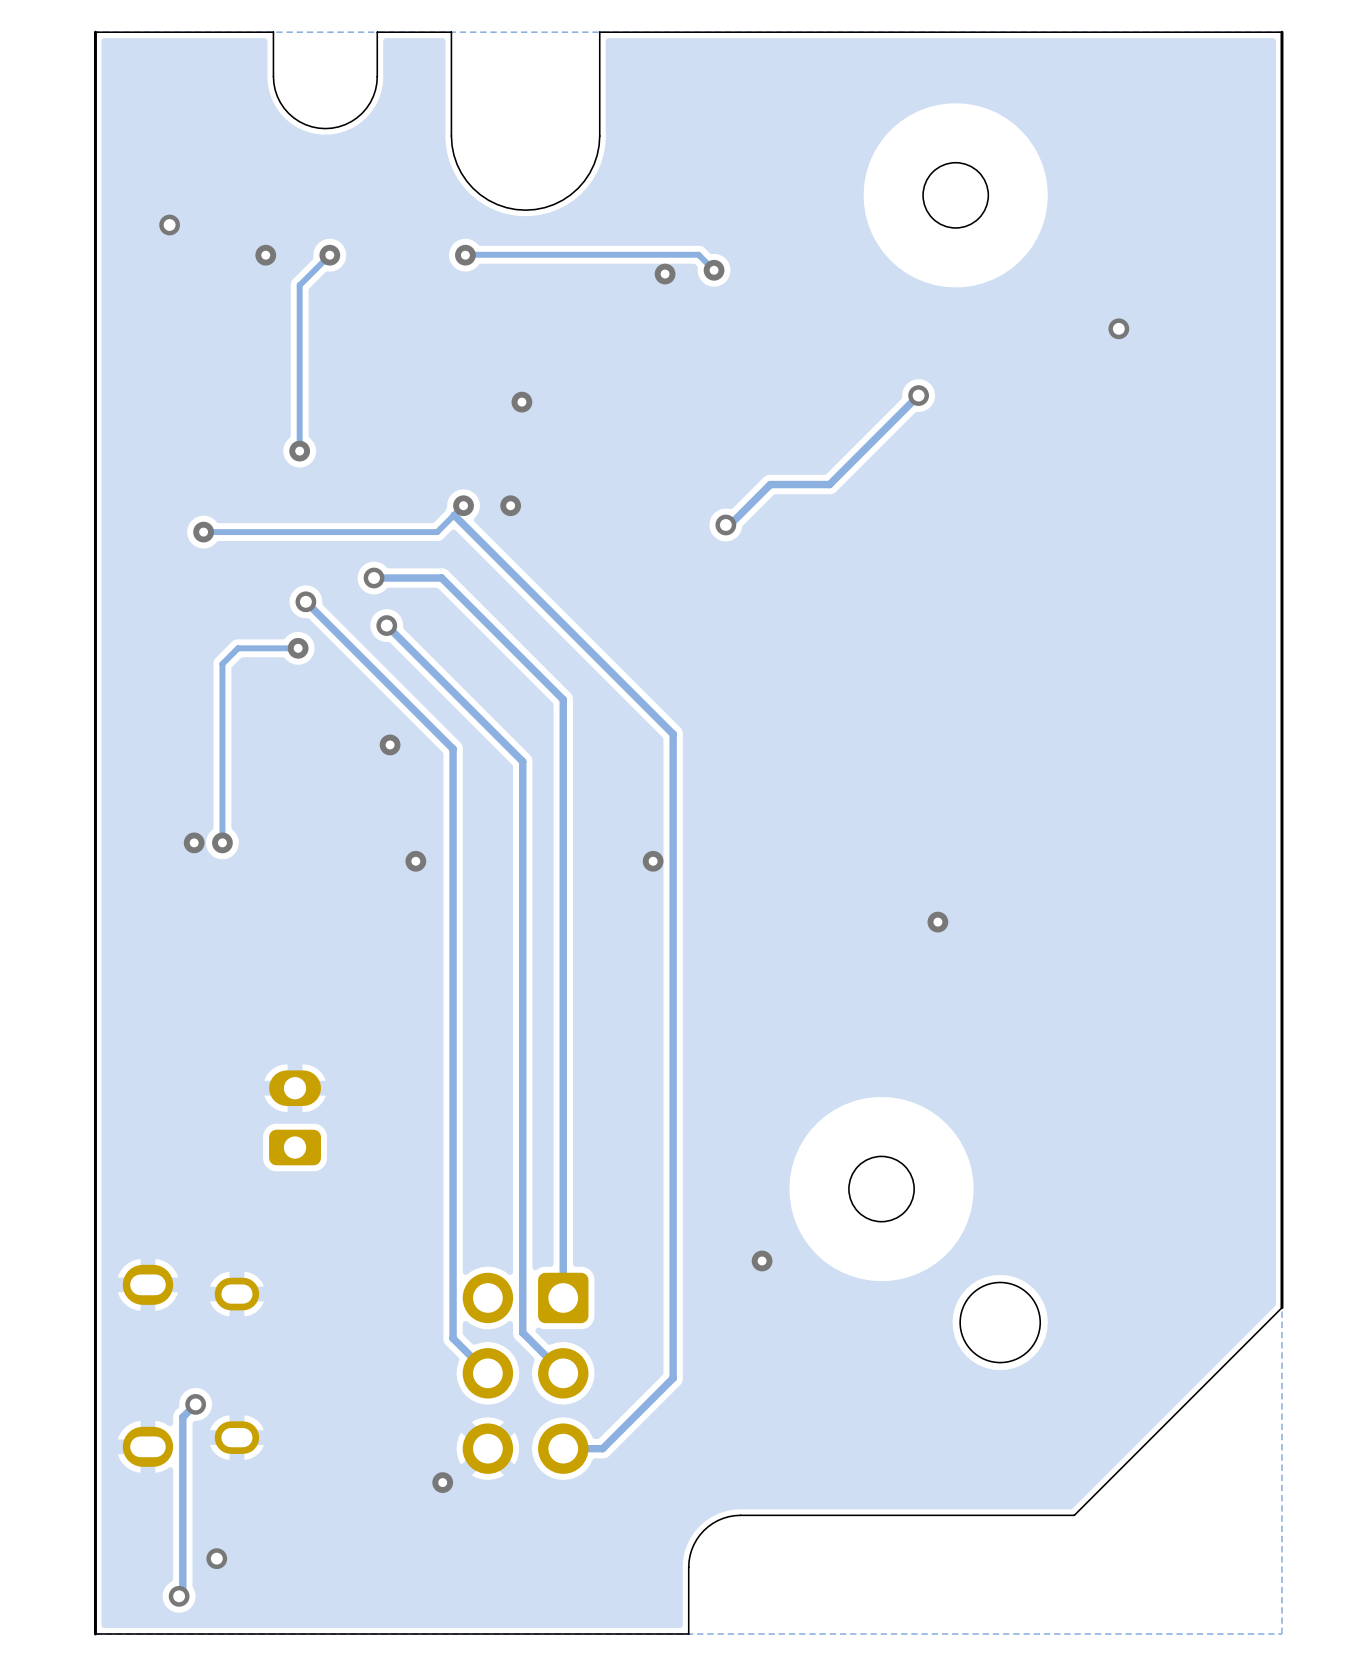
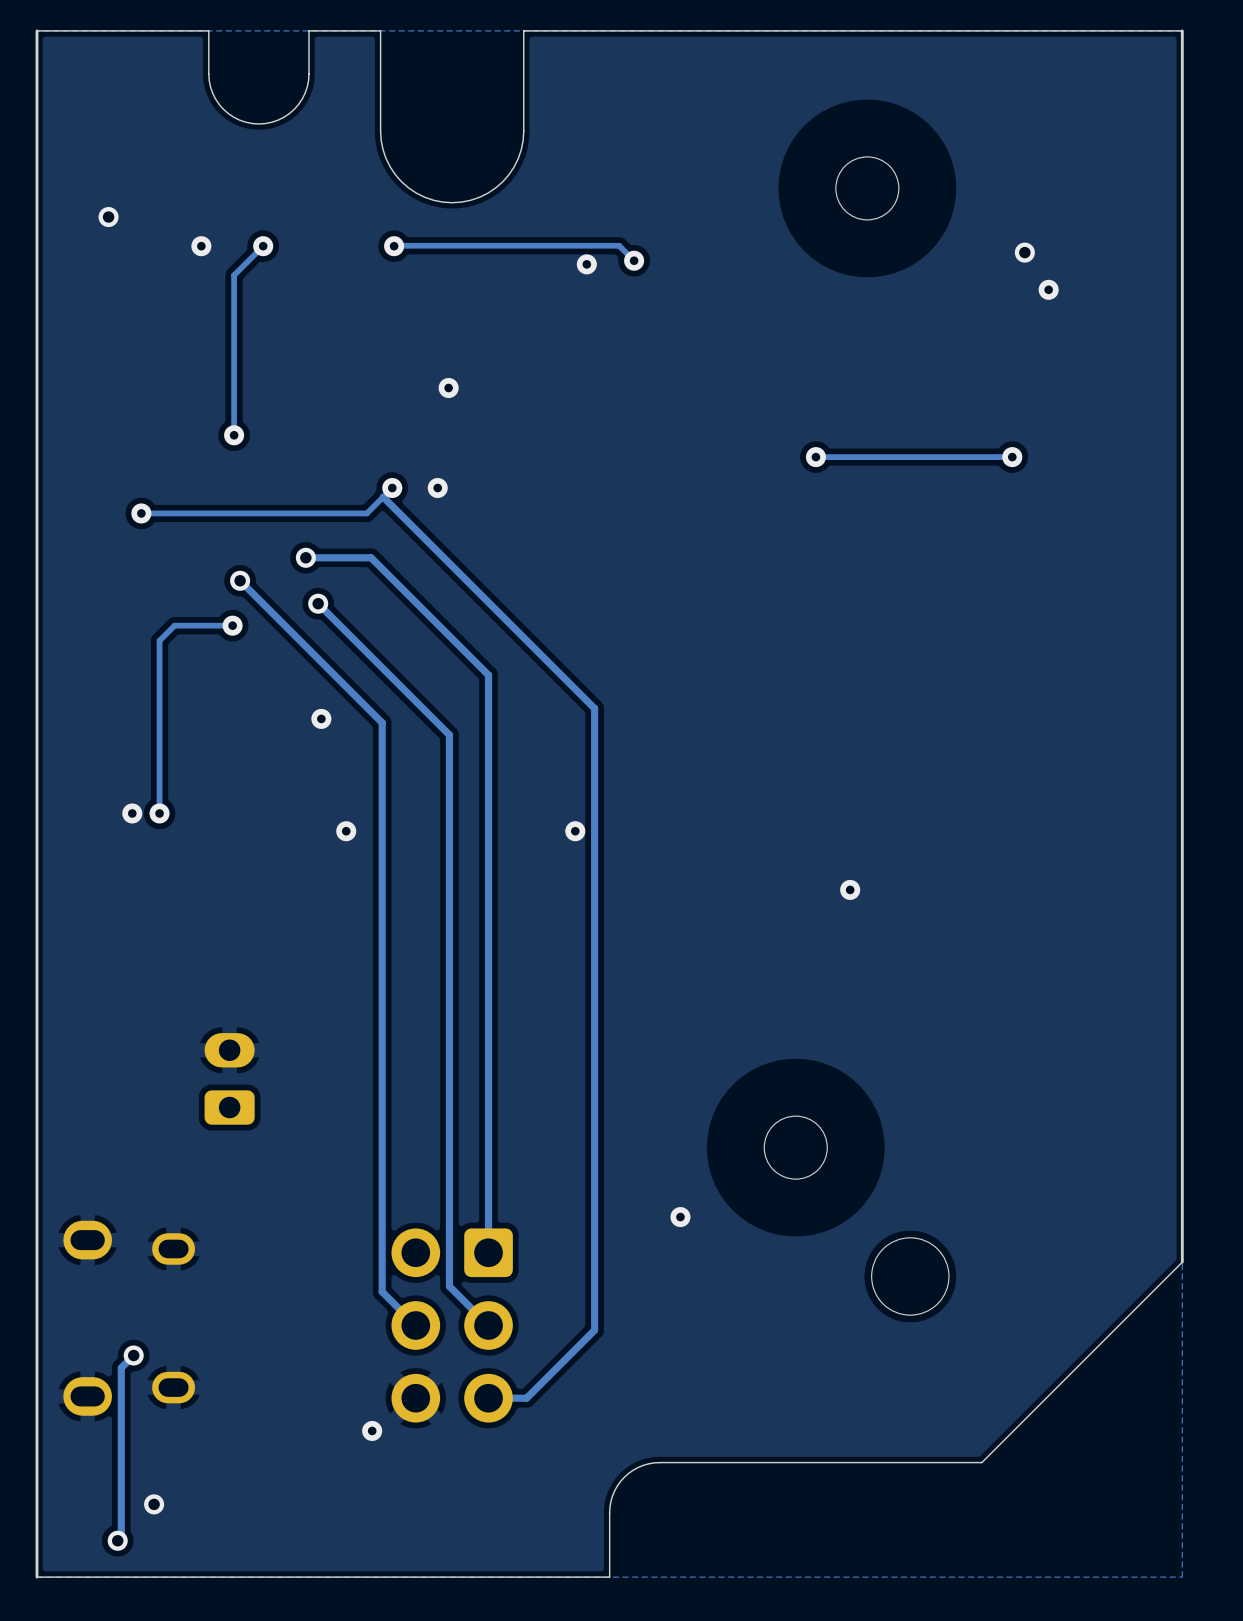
via: none -> (1048, 289)
via position: (1118, 328) -> (1024, 252)
track: (918, 395) (829, 484) (770, 484) (729, 525) (725, 525) -> none
via: (918, 395) -> none
via: none -> (815, 457)
track: none -> (1012, 457) (815, 457)
via: none -> (1012, 457)
via: (725, 525) -> none

